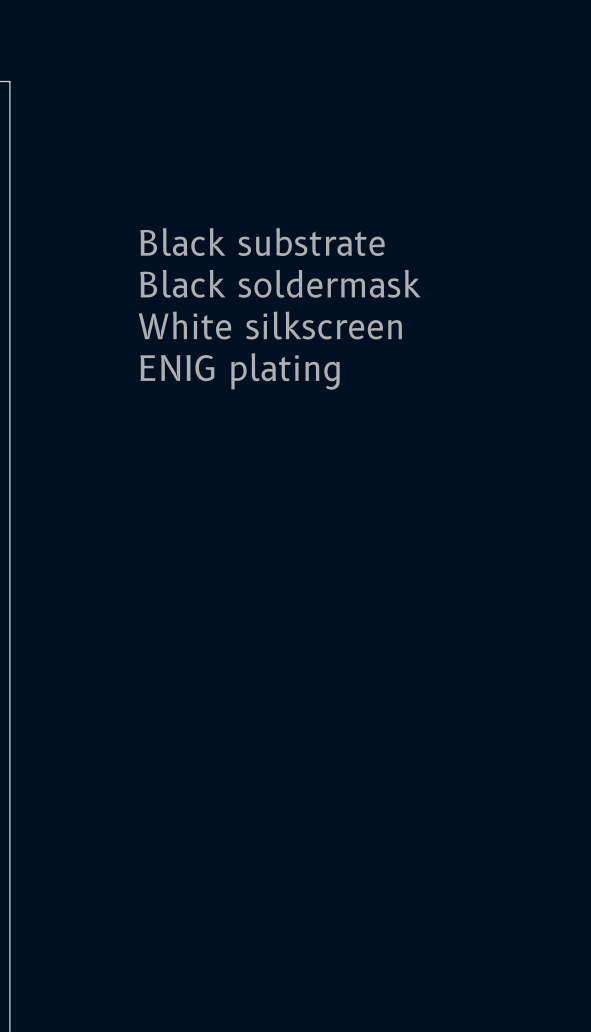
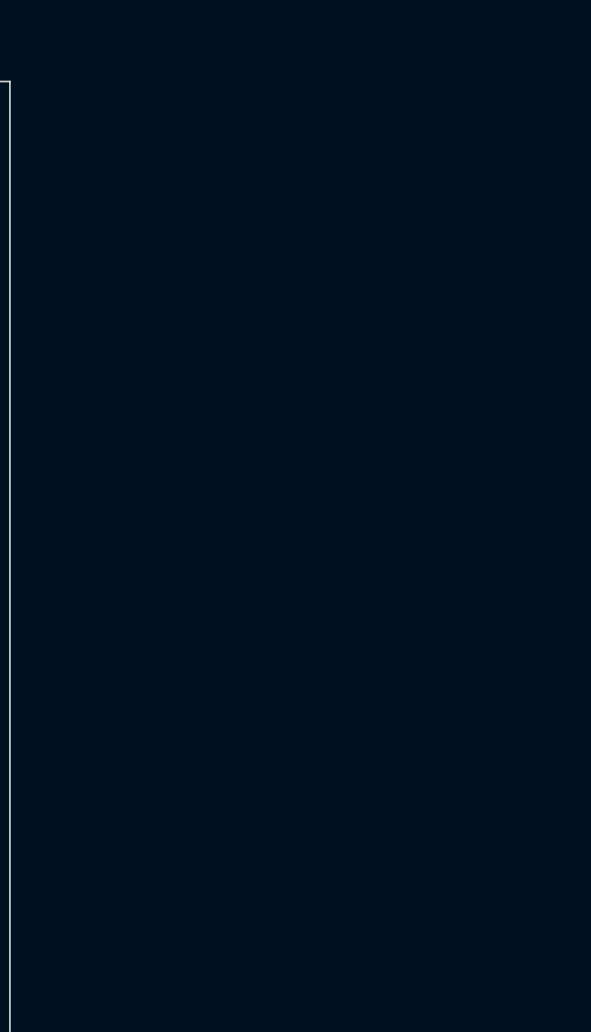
text: Black substrate (262, 242) -> none
text: Black soldermask (280, 283) -> none
text: White silkscreen (270, 325) -> none
text: ENIG plating (239, 371) -> none

